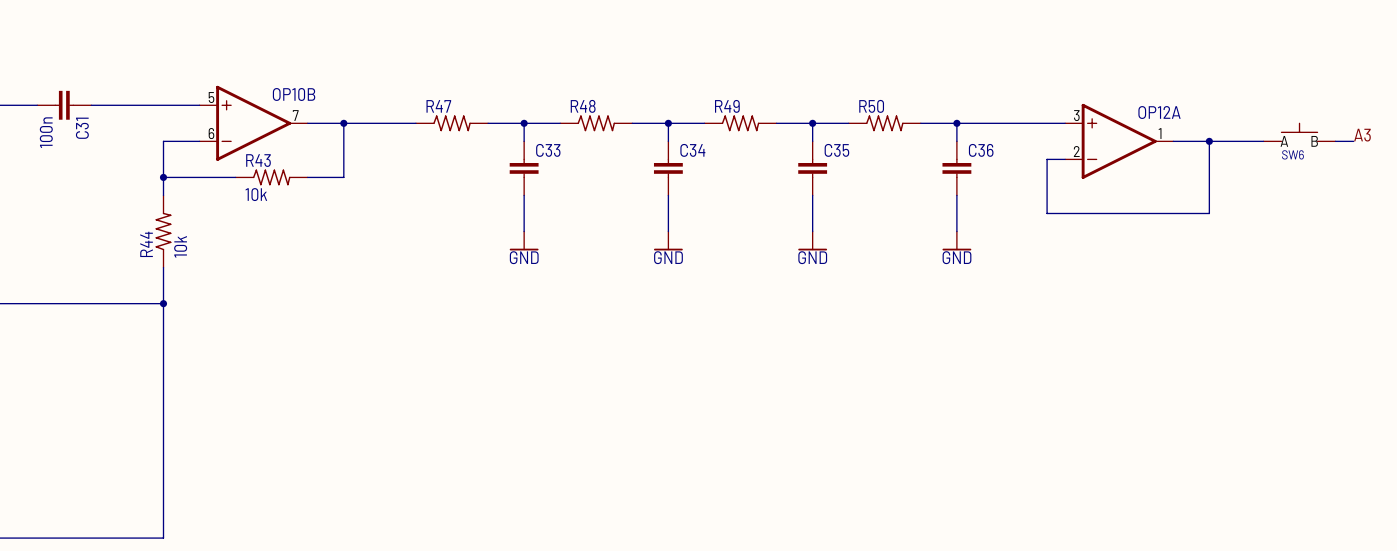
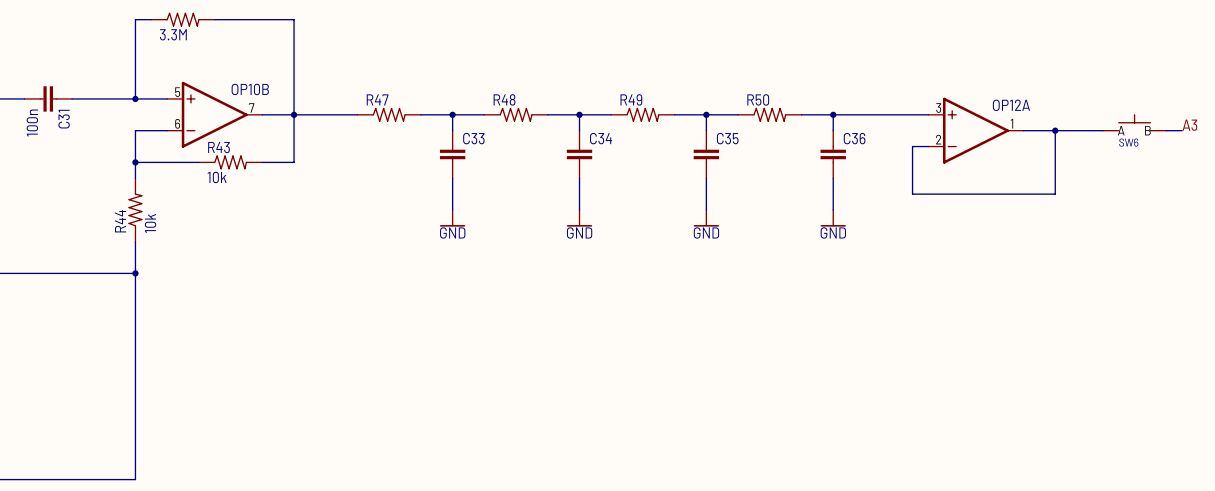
wire: none -> (151, 19) (135, 19) (135, 98)
part: none -> 3.3M (183, 19)
wire: none -> (214, 19) (294, 19) (294, 114)
junction: none -> (135, 98)

